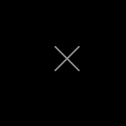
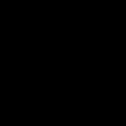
no-connect mark: (67, 58) -> none

